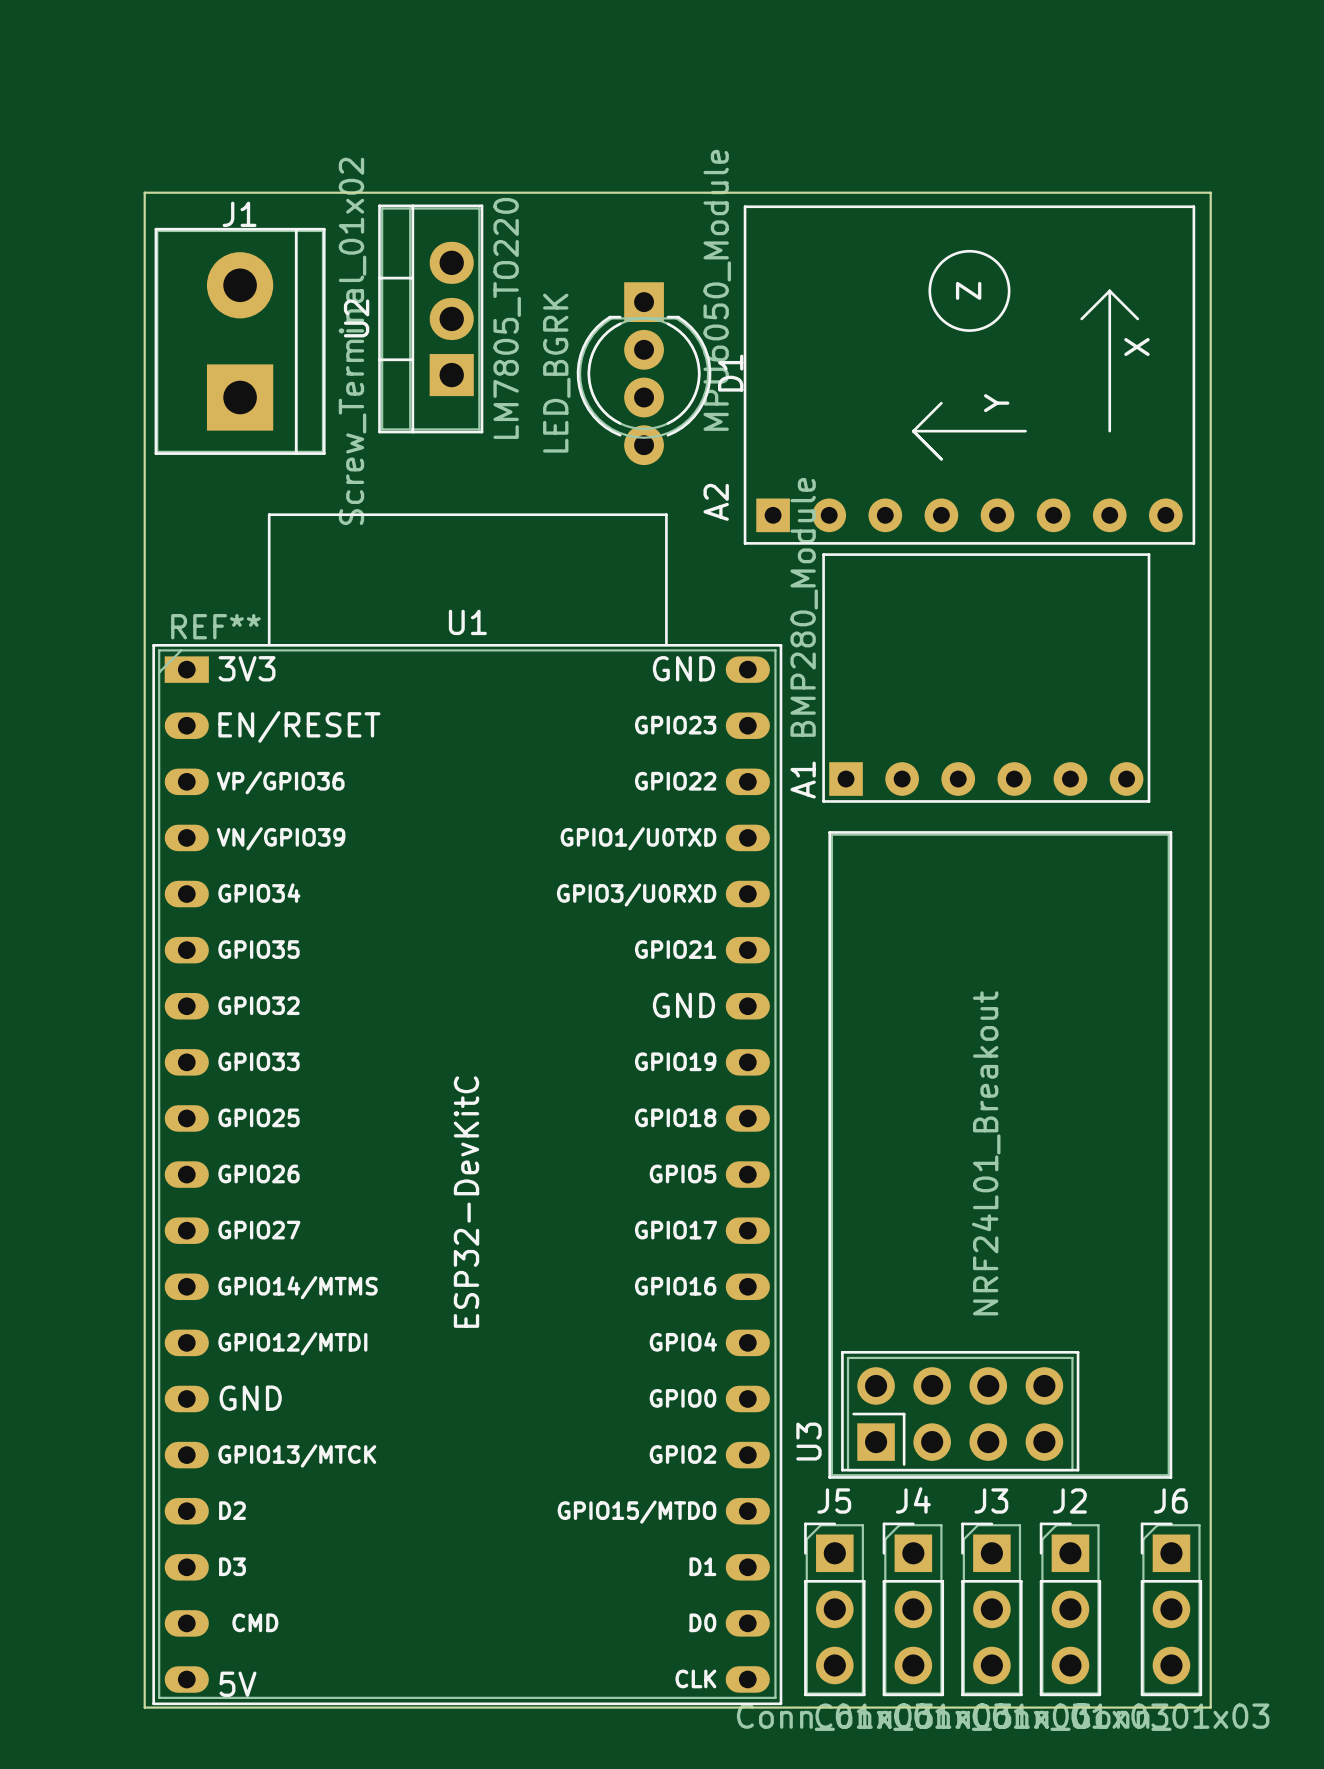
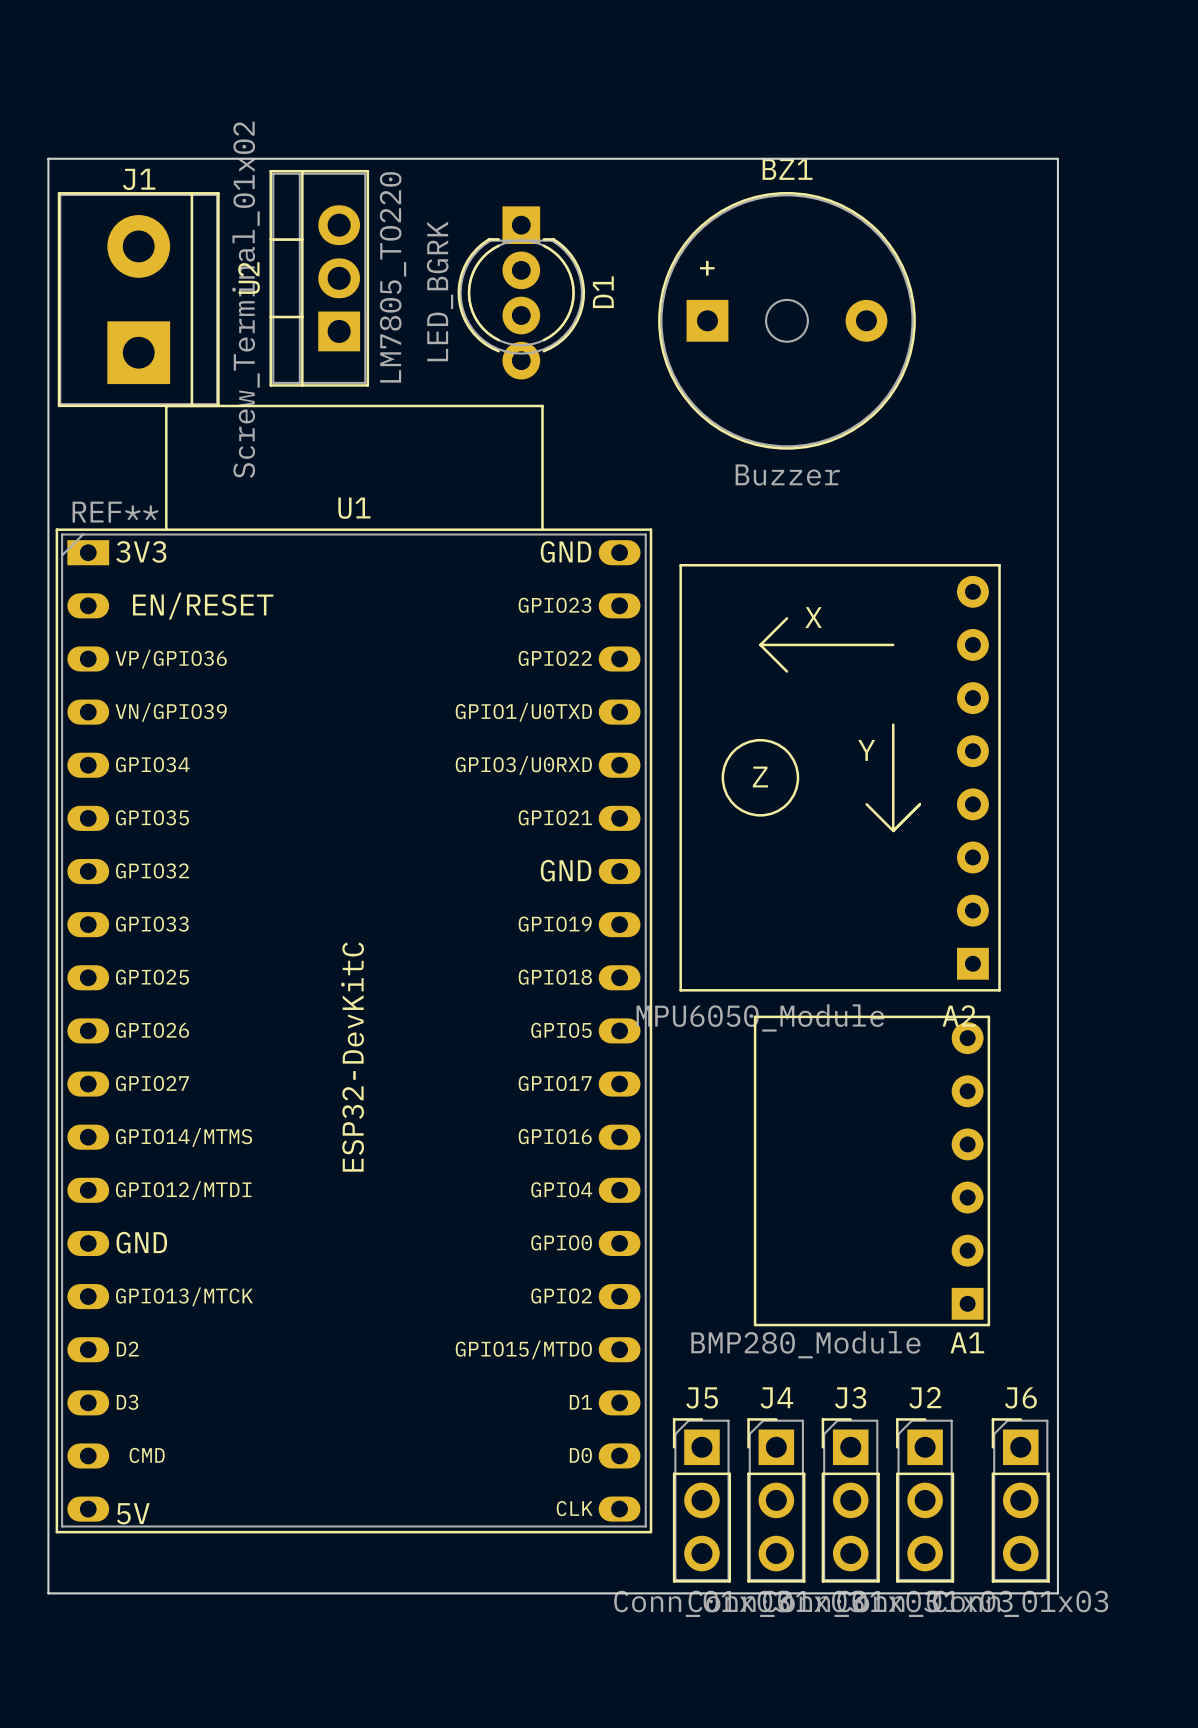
BZ1: none -> Buzzer (786, 320)
D1 position: (644, 373) -> (521, 292)
A2 rotation: 0° (969, 375) -> 90° counterclockwise (840, 777)
A2 position: (969, 375) -> (840, 777)
A1 rotation: 0° (986, 678) -> 90° counterclockwise (871, 1170)
A1 position: (986, 678) -> (871, 1170)
U1 position: (467, 1109) -> (353, 969)
U3: NRF24L01_Breakout (1000, 1154) -> none

